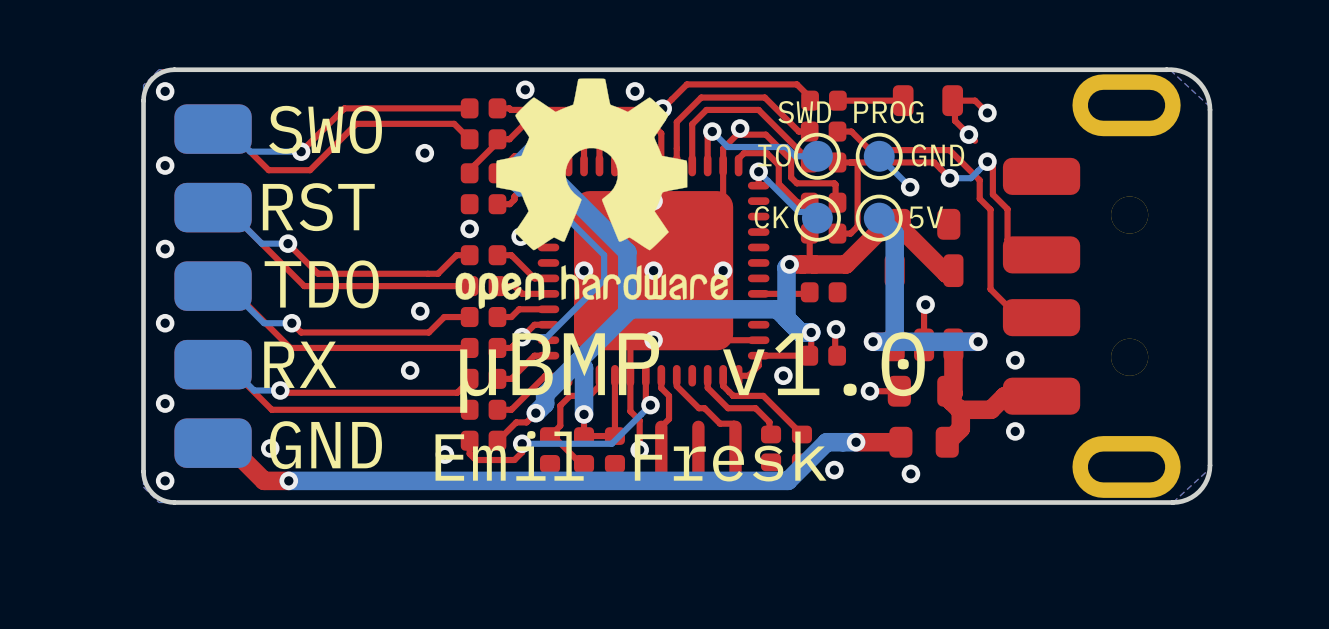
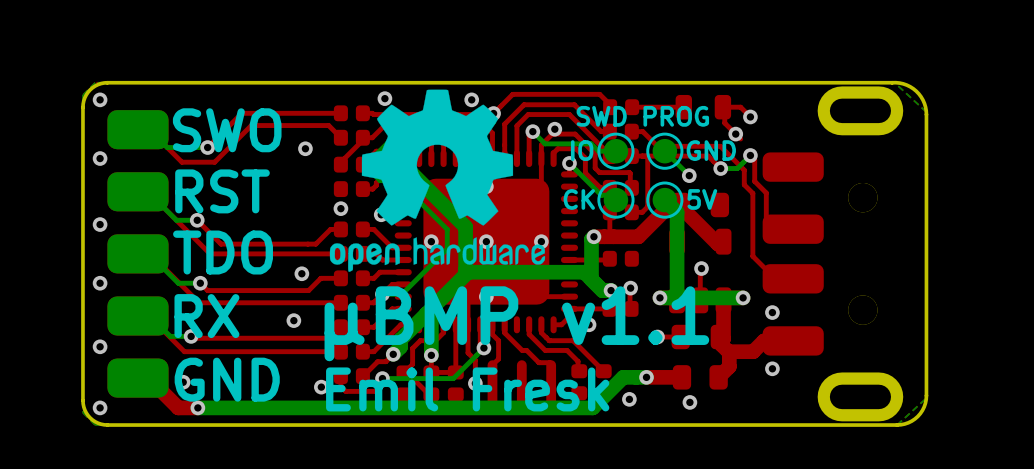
text: µBMP v1.0 (692, 372) -> µBMP v1.1 (516, 323)

